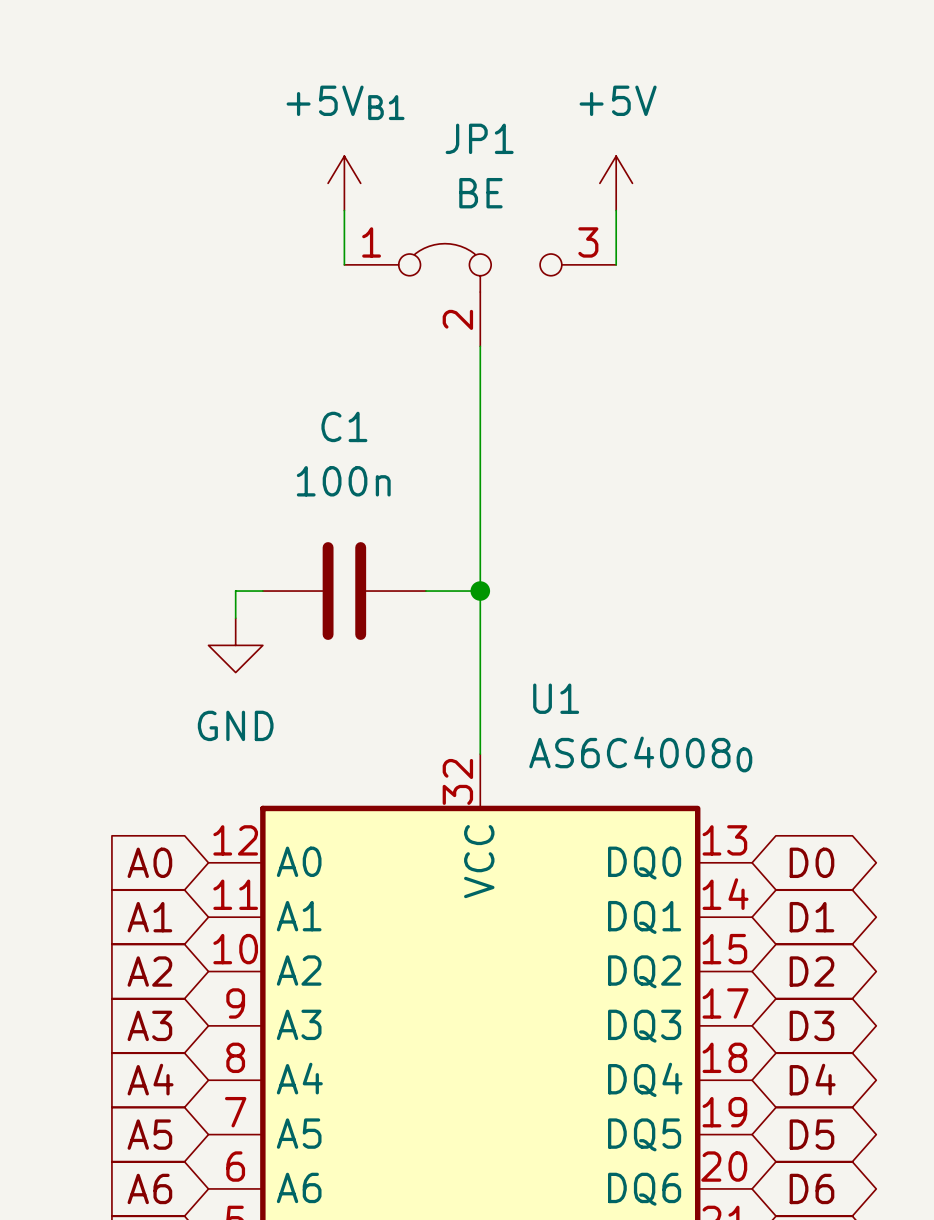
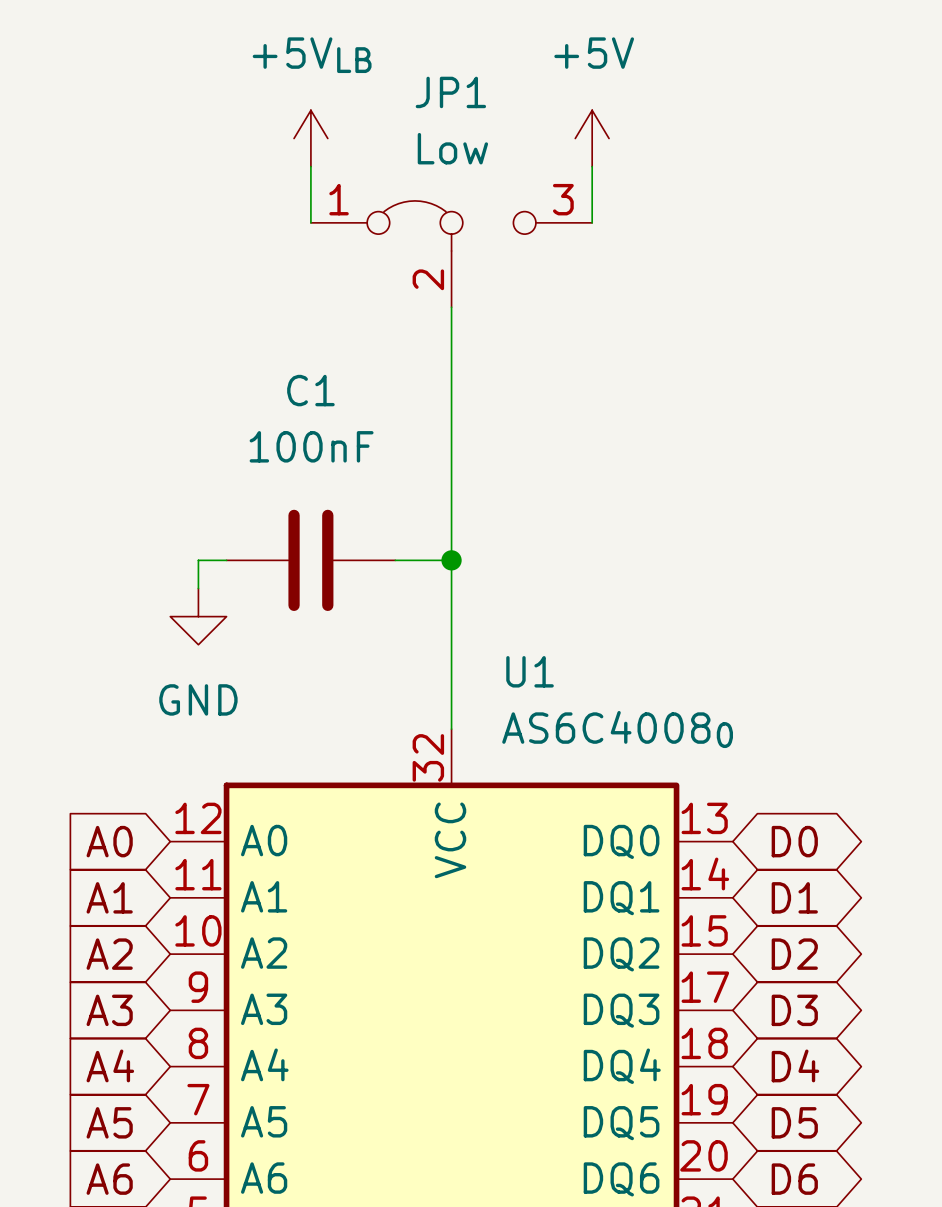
power symbol: +5VB1 (344, 183) -> +5VLB (310, 138)
JP1 value: BE (480, 193) -> Low (452, 148)
C1 value: 100n (343, 481) -> 100nF (311, 446)

